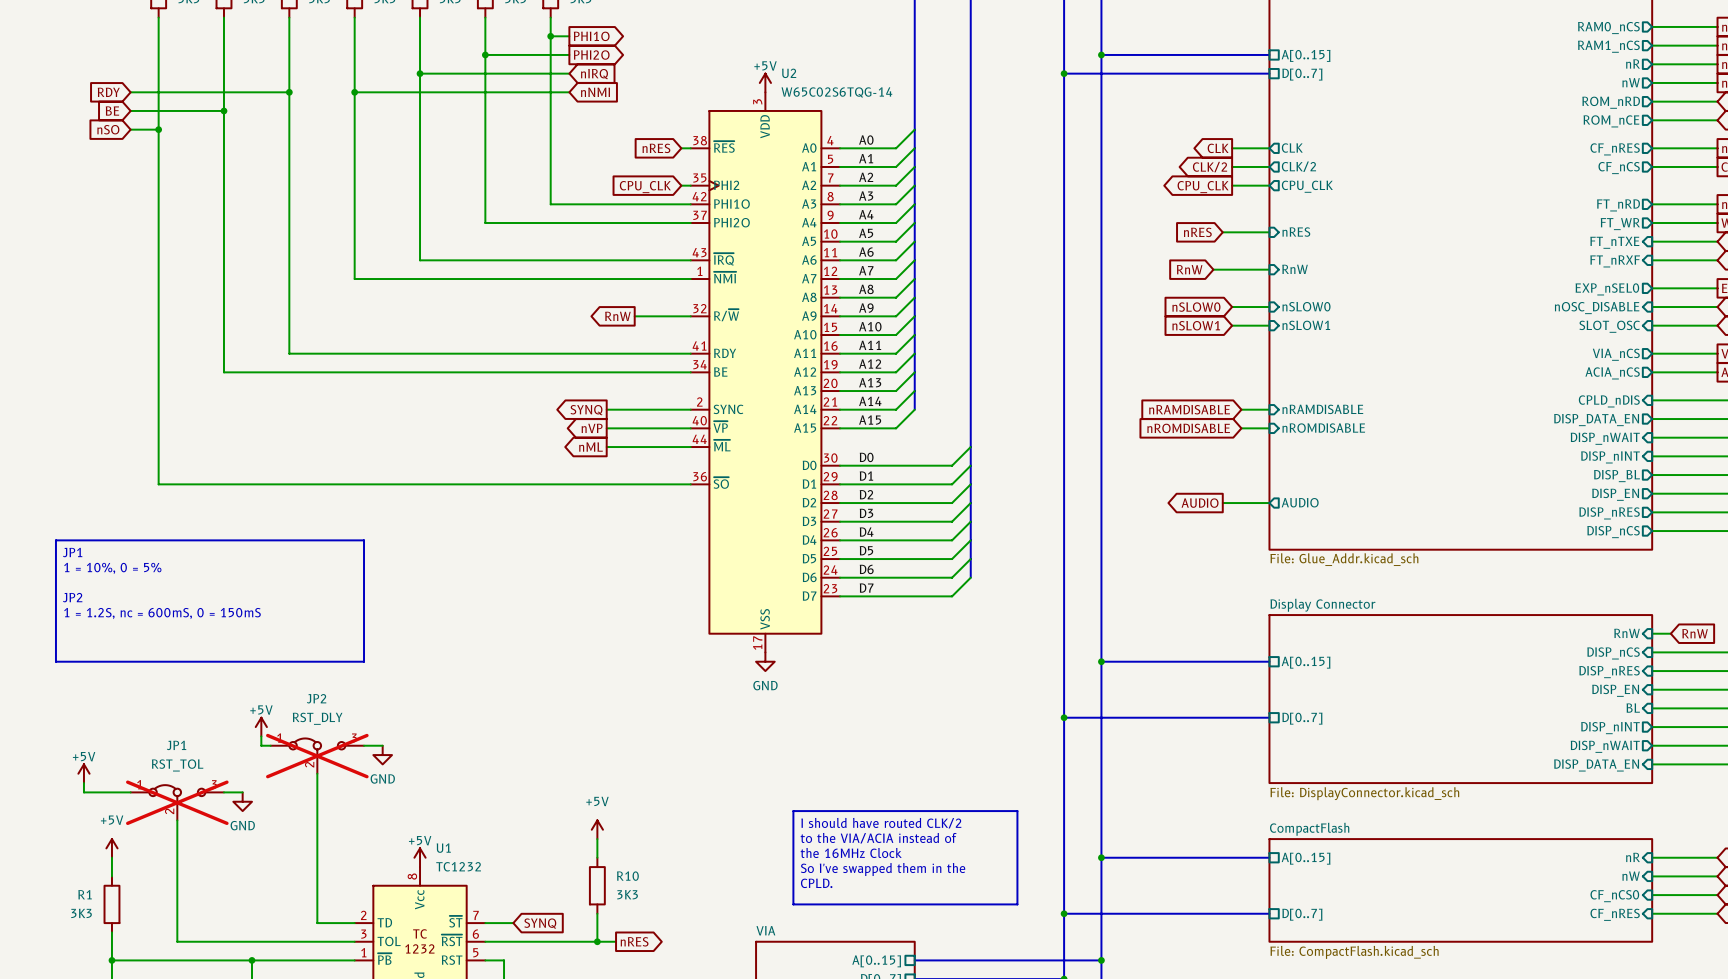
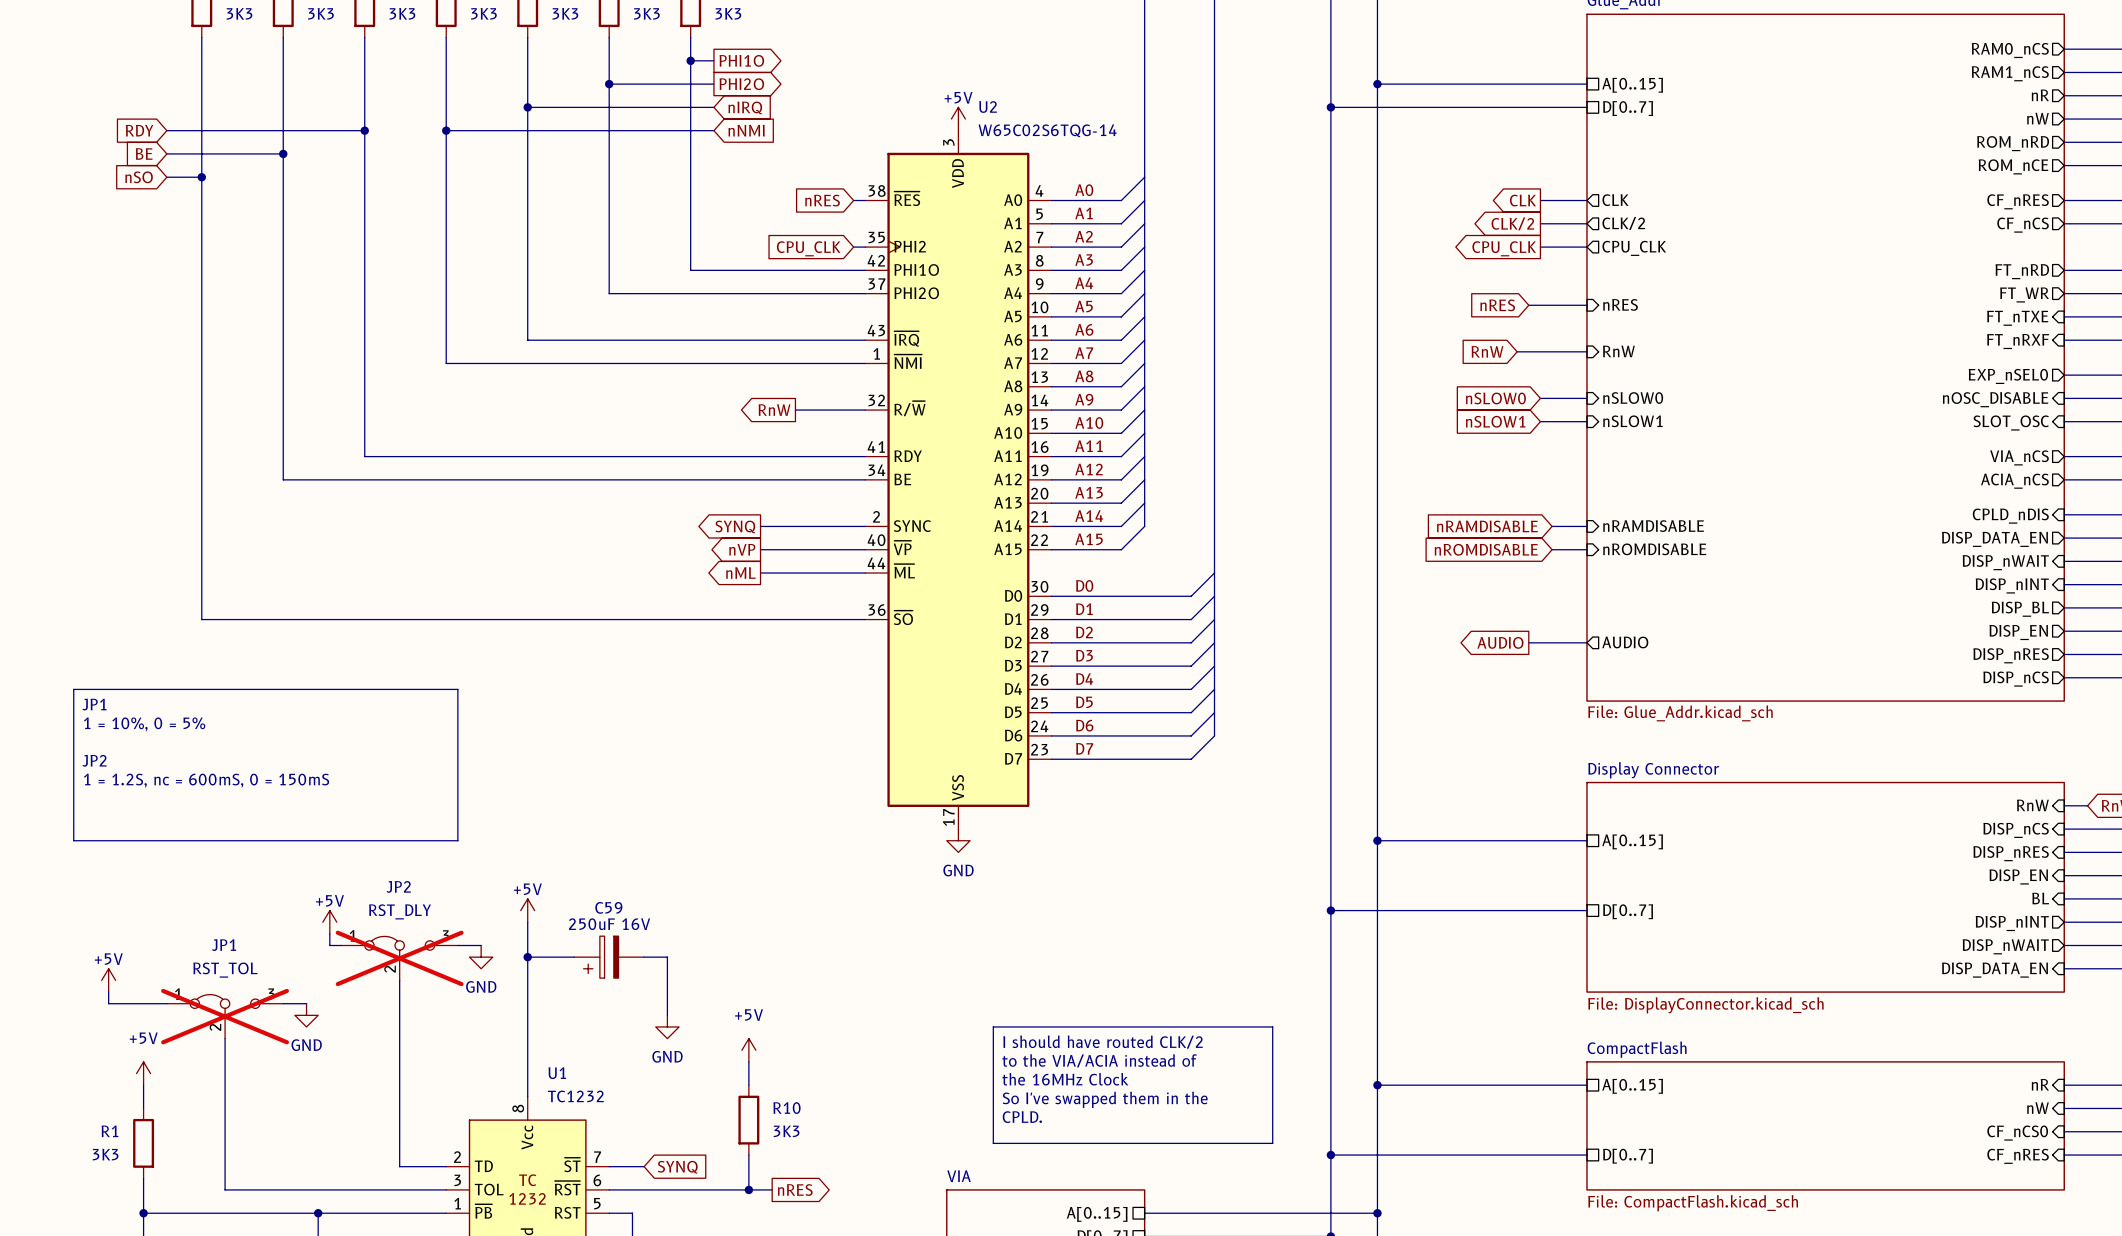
wire: none -> (527, 922) (527, 1096)
wire: none -> (527, 957) (574, 957)
junction: none -> (527, 957)
C59: none -> 250uF 16V (609, 957)
wire: none -> (644, 957) (667, 957) (667, 1015)
power symbol: none -> GND (667, 1026)
power symbol position: +5V (420, 857) -> +5V (527, 910)

